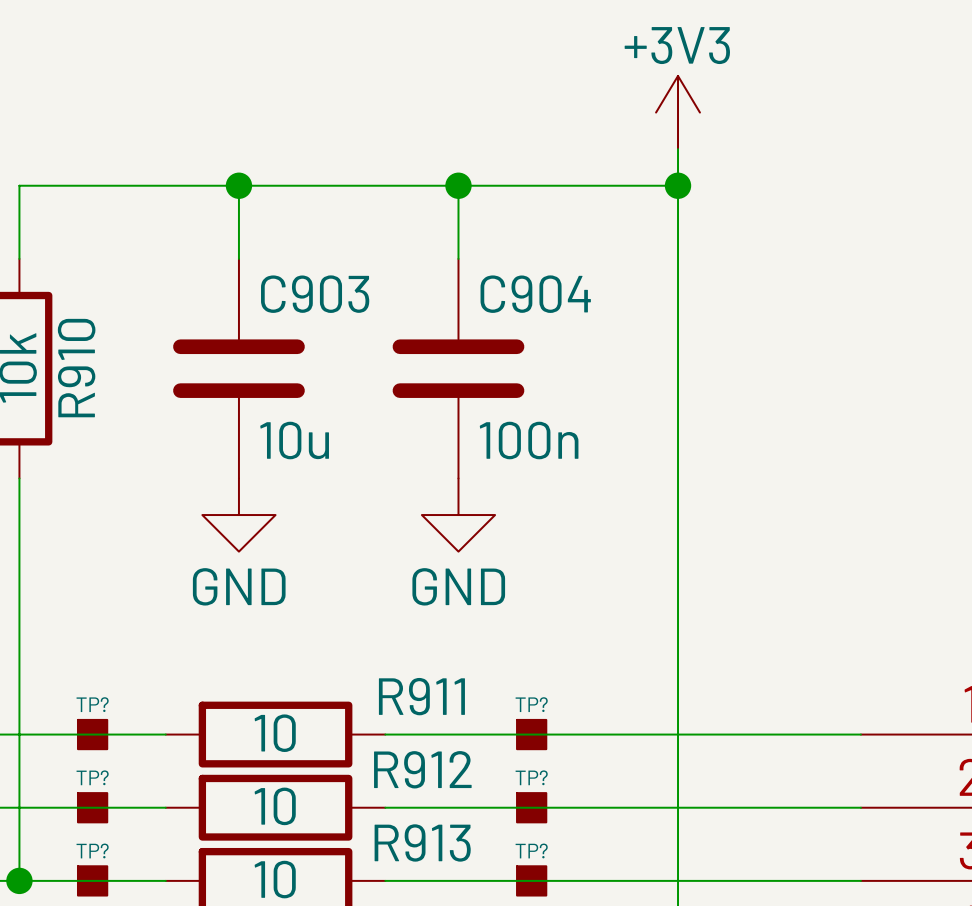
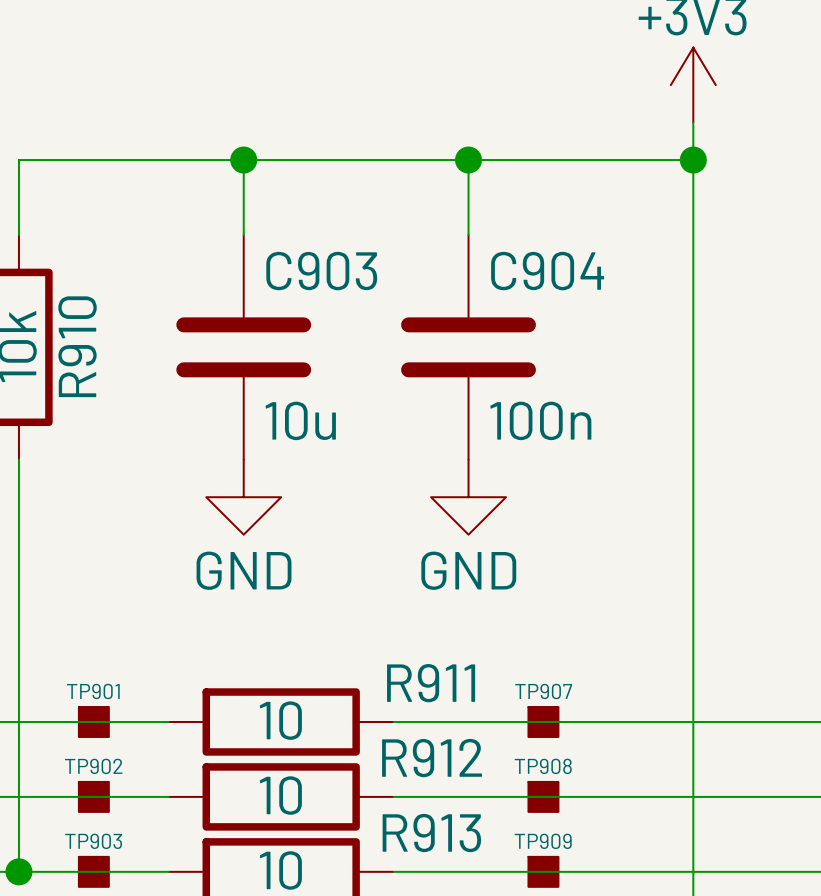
TP? name: TP? (92, 704) -> TP901 (93, 691)
TP? name: TP? (531, 704) -> TP907 (543, 691)
TP? name: TP? (92, 777) -> TP902 (93, 766)
TP? name: TP? (531, 777) -> TP908 (543, 766)
TP? name: TP? (92, 850) -> TP903 (93, 841)
TP? name: TP? (531, 850) -> TP909 (543, 841)

